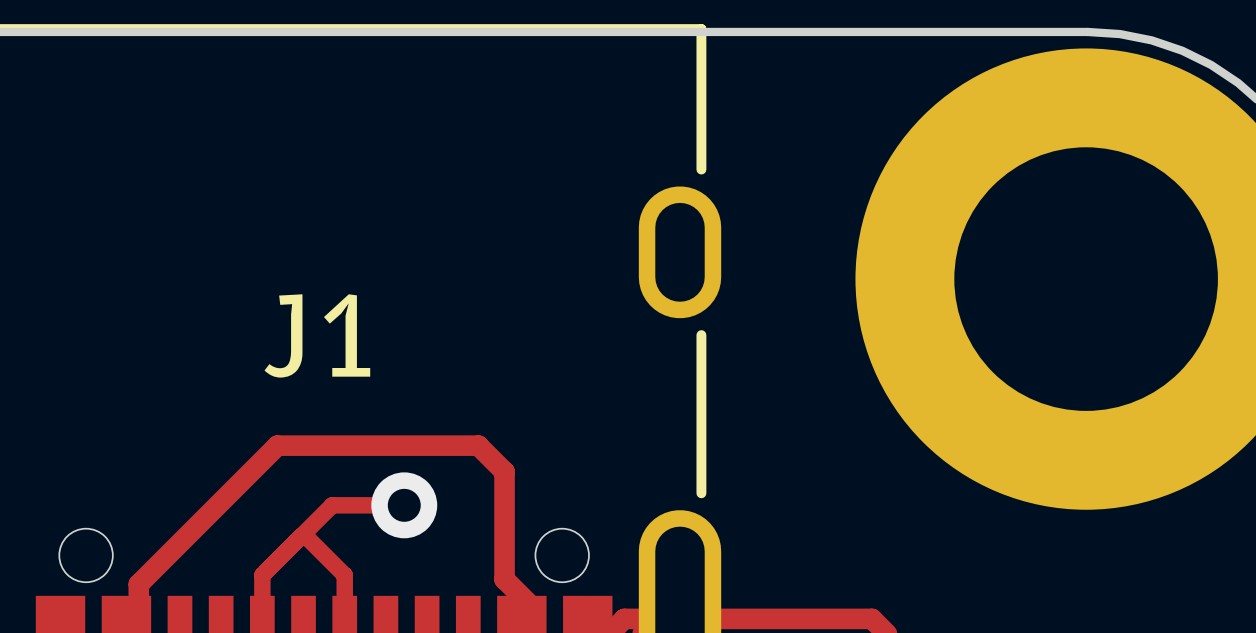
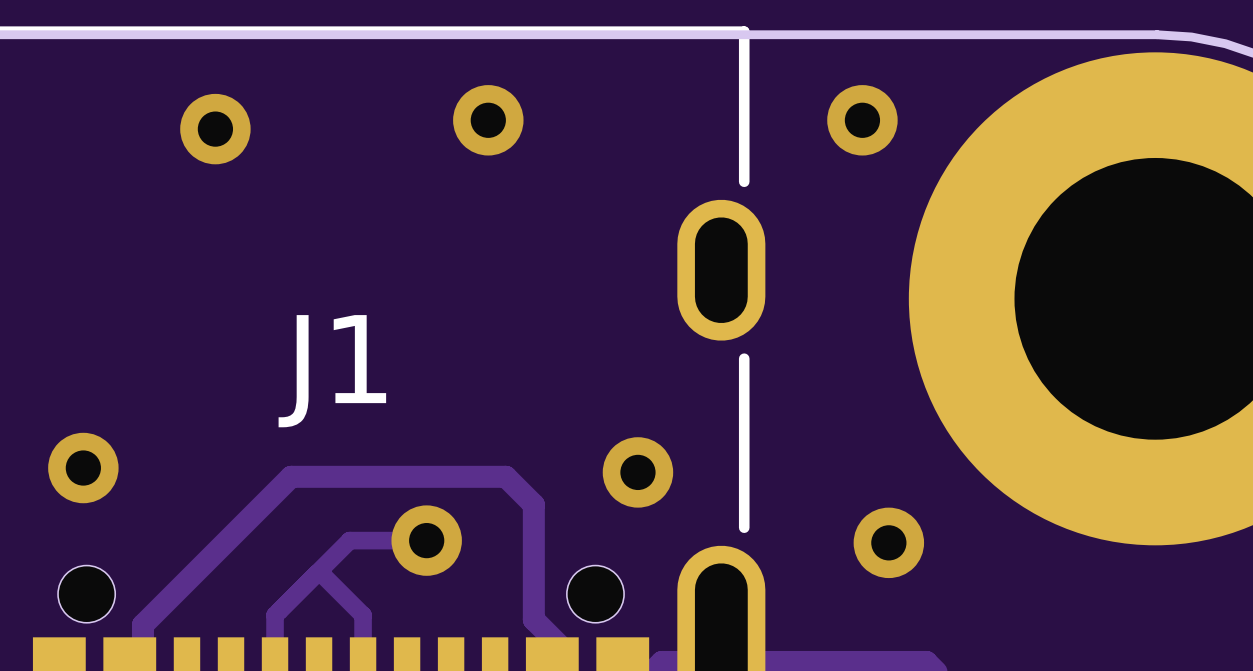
via: none -> (488, 120)
via: none -> (862, 120)
via: none -> (215, 129)
via: none -> (83, 468)
via: none -> (637, 472)
via: none -> (888, 542)

